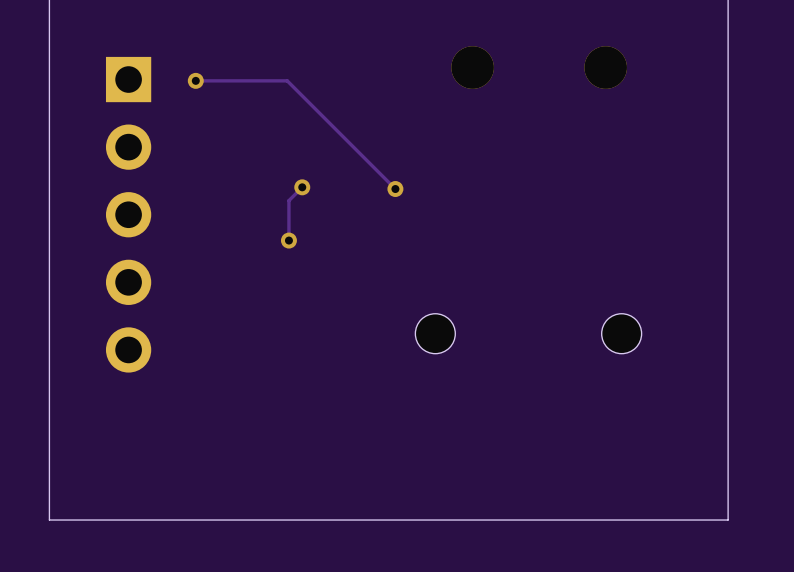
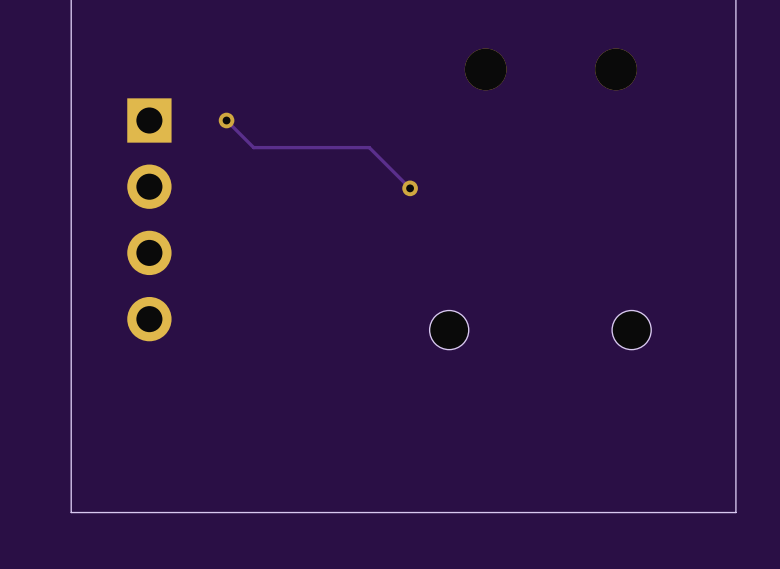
part footprint: [105, 56, 152, 373] -> [127, 98, 172, 342]
track: (195, 80) (287, 80) (353, 147) -> (226, 120) (253, 147) (369, 147)
via position: (195, 80) -> (226, 120)
track: (302, 187) (288, 200) (288, 240) -> none
via: (302, 187) -> none
via: (288, 240) -> none

